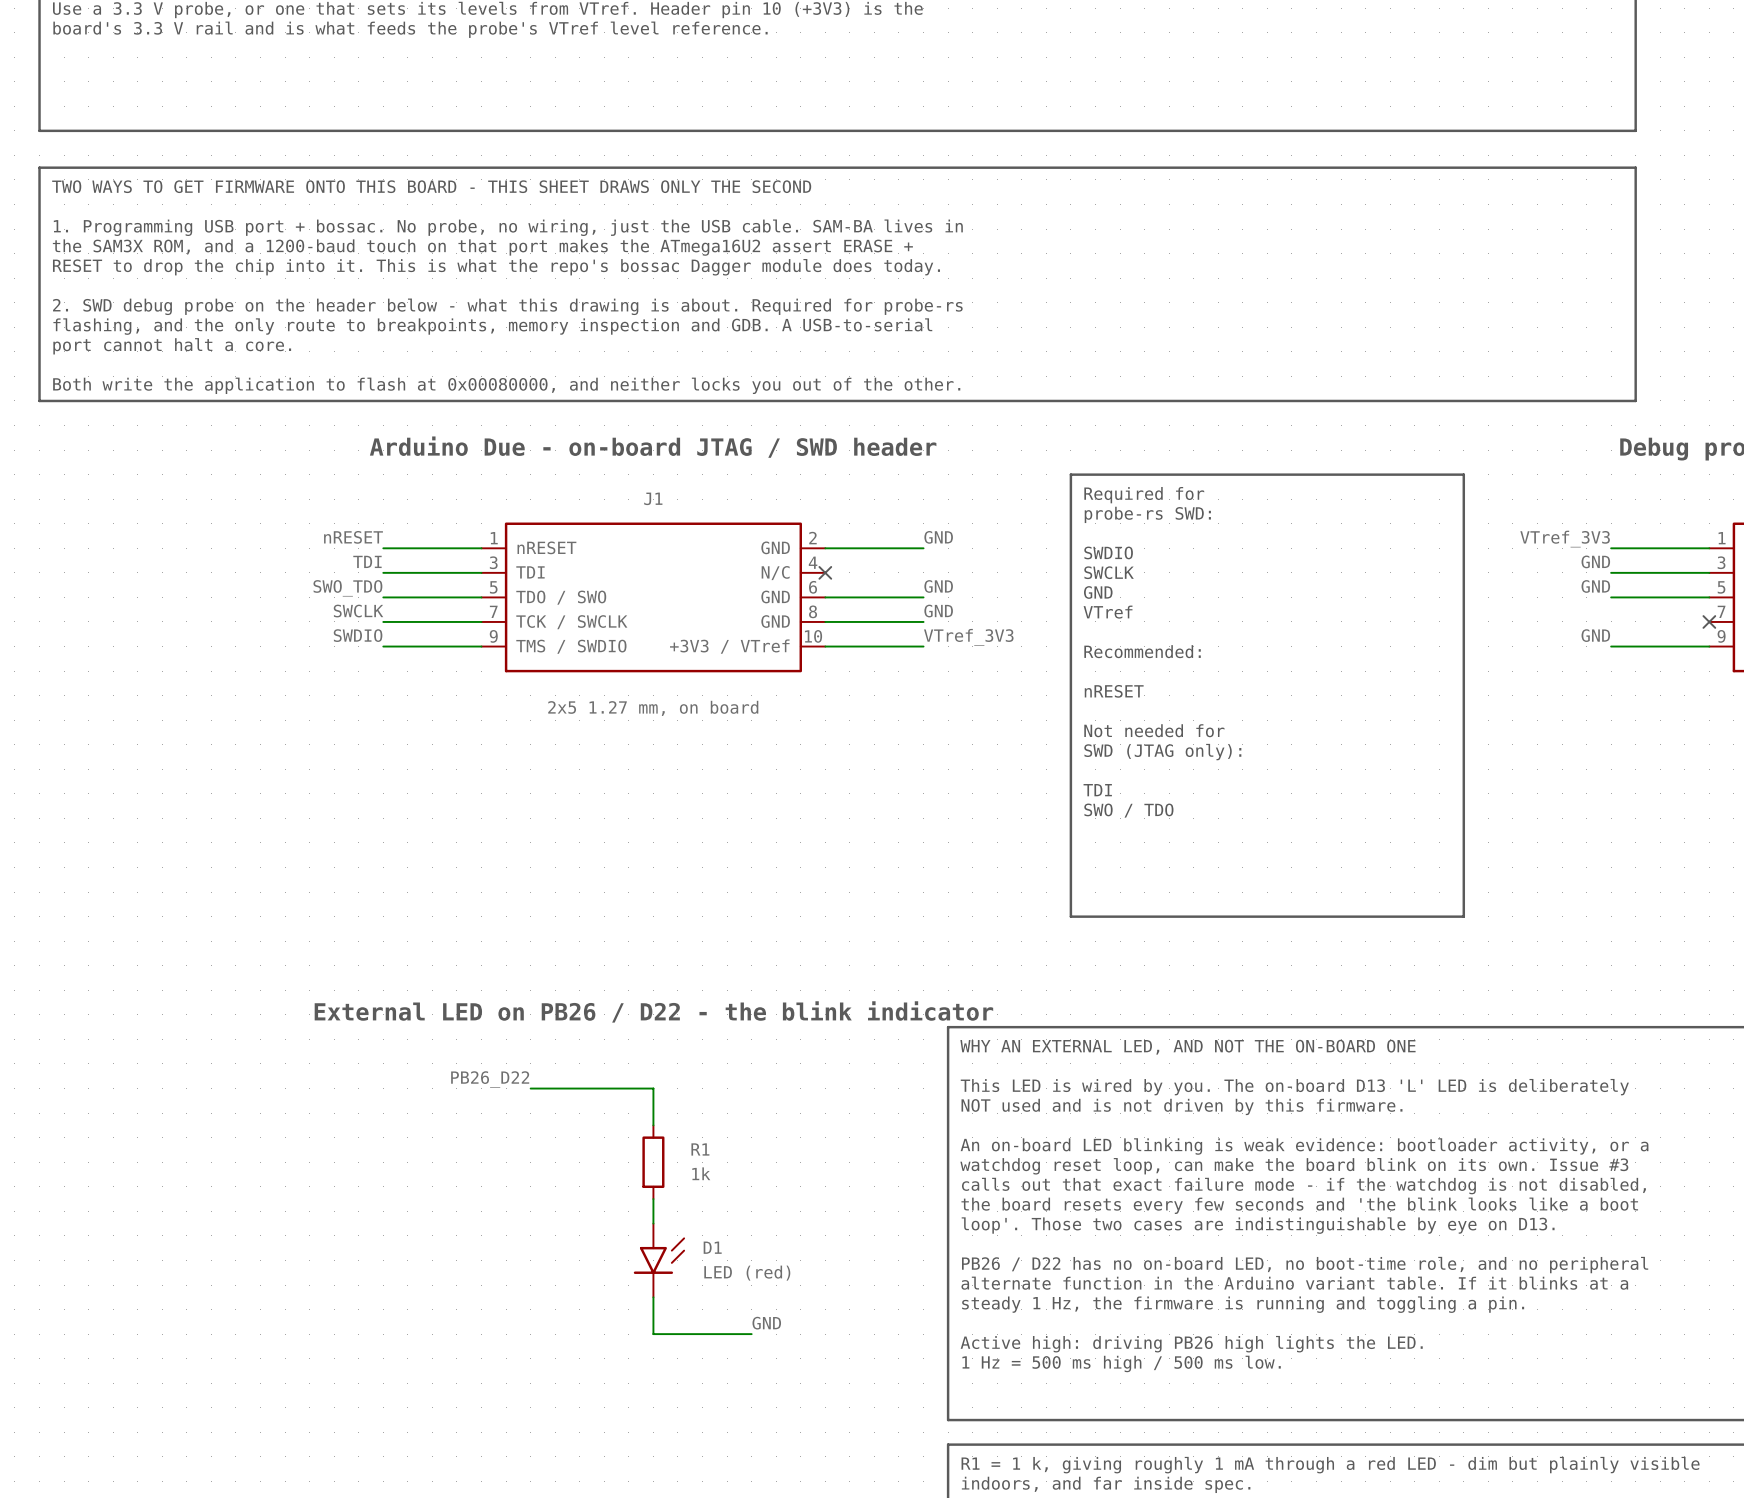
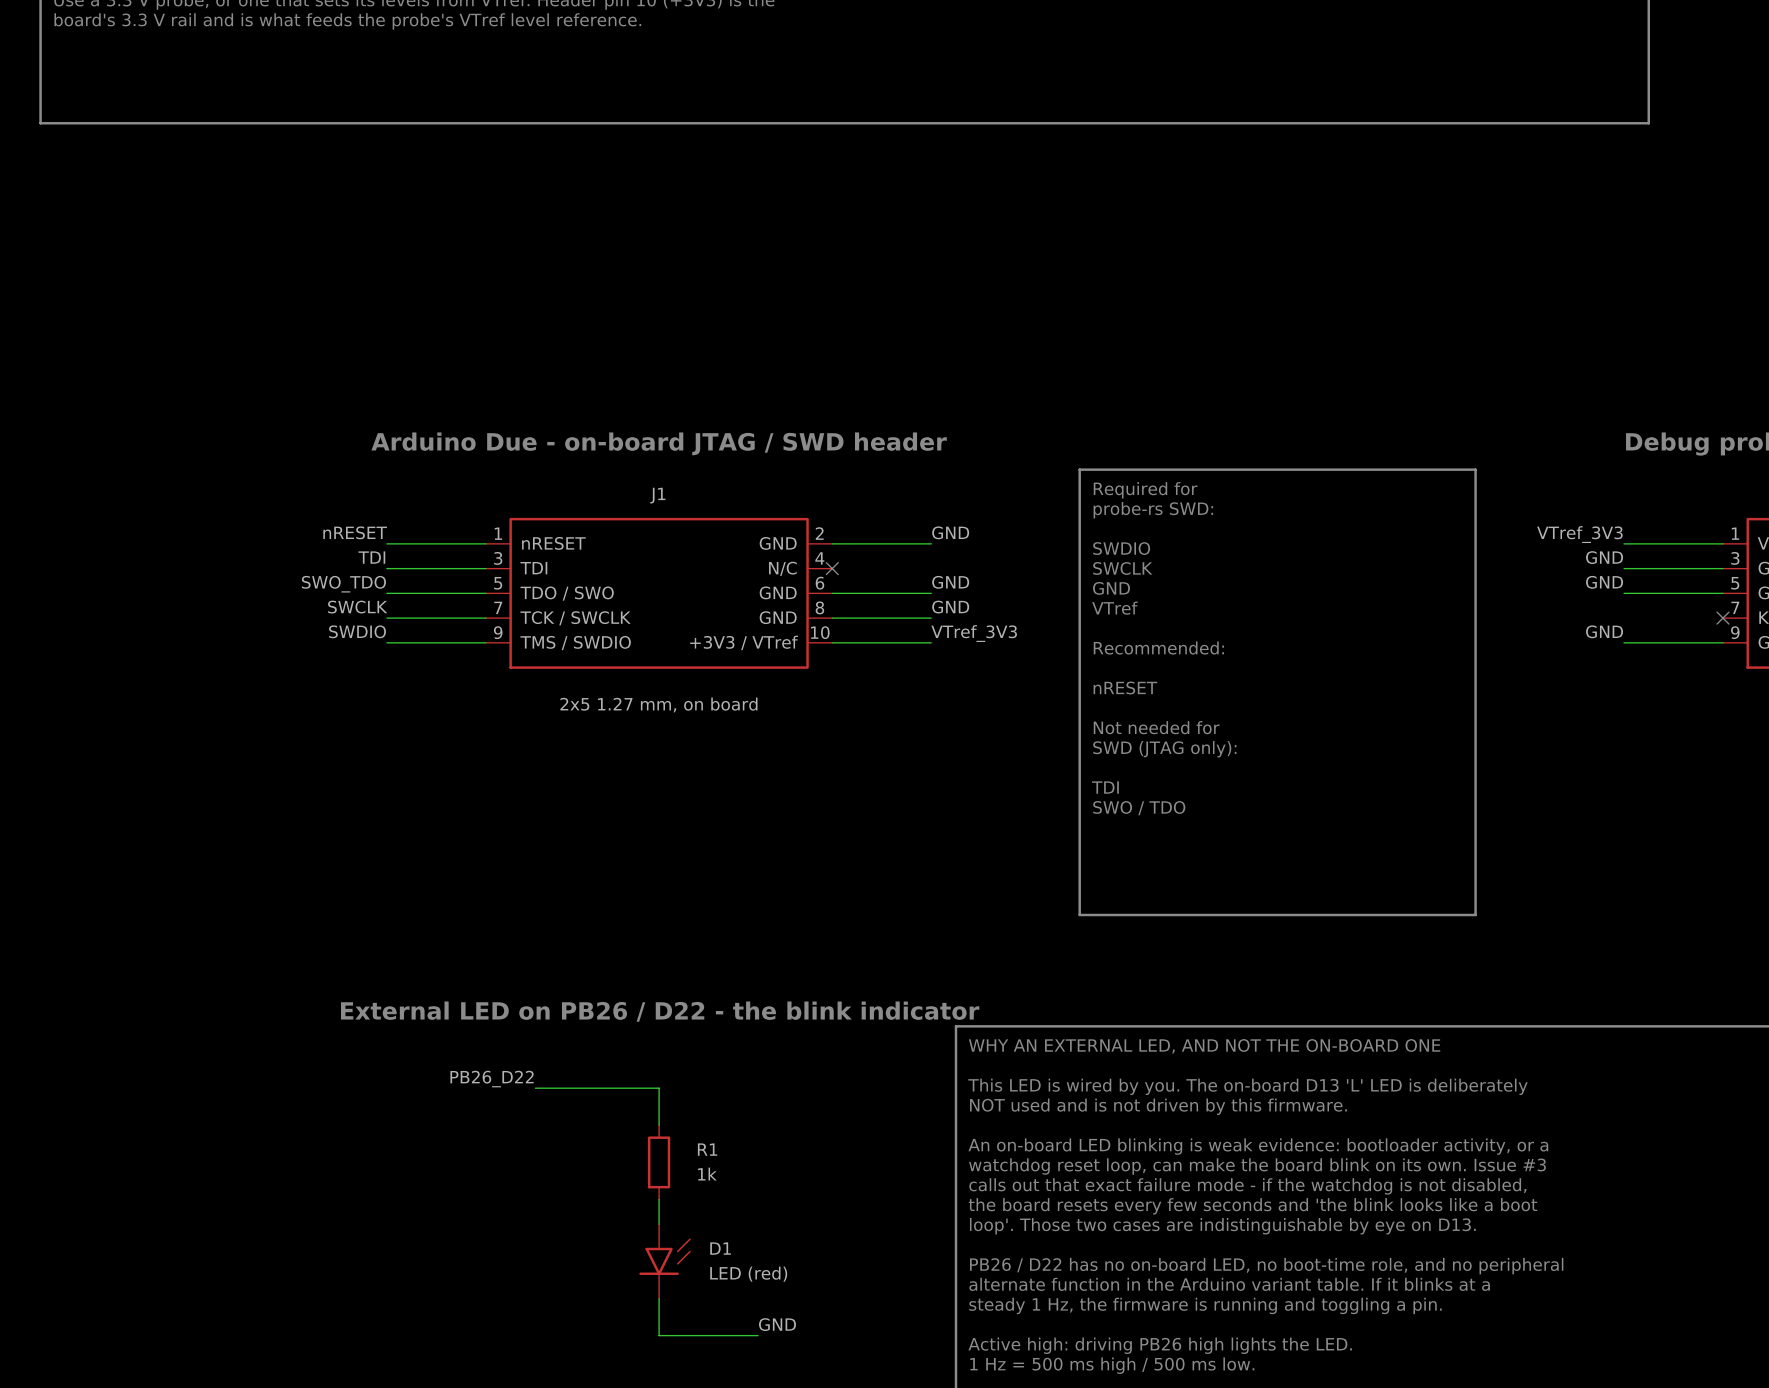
line: (39, 167) (1635, 167) (1635, 400) (39, 400) (39, 167) -> none
text: TWO WAYS TO GET FIRMWARE ONTO THIS BOARD - THIS SHEET DRAWS ONLY THE SECOND (431, 186) -> none
text: 1. Programming USB port + bossac. No probe, no wiring, just the USB cable. SAM-BA lives in (508, 227) -> none
text: the SAM3X ROM, and a 1200-baud touch on that port makes the ATmega16U2 assert ERASE + (482, 247) -> none
text: RESET to drop the chip into it. This is what the repo's bossac Dagger module does today. (496, 267) -> none
text: 2. SWD debug probe on the header below - what this drawing is about. Required for probe-rs (507, 306) -> none
text: flashing, and the only route to breakpoints, memory inspection and GDB. A USB-to-serial (492, 326) -> none
text: port cannot halt a core. (172, 346) -> none
text: Both write the application to flash at 0x00080000, and neither locks you out of the other. (506, 385) -> none

